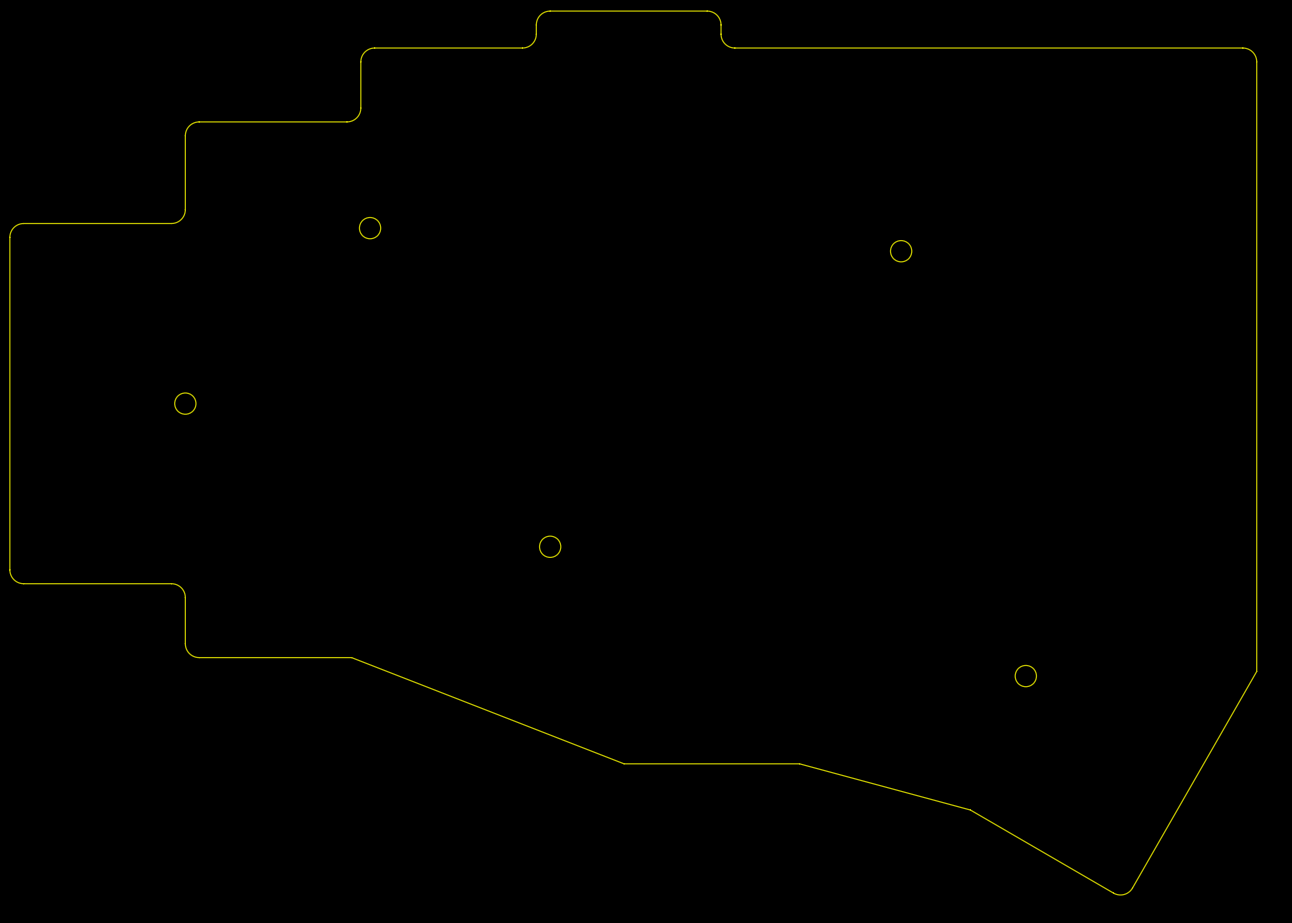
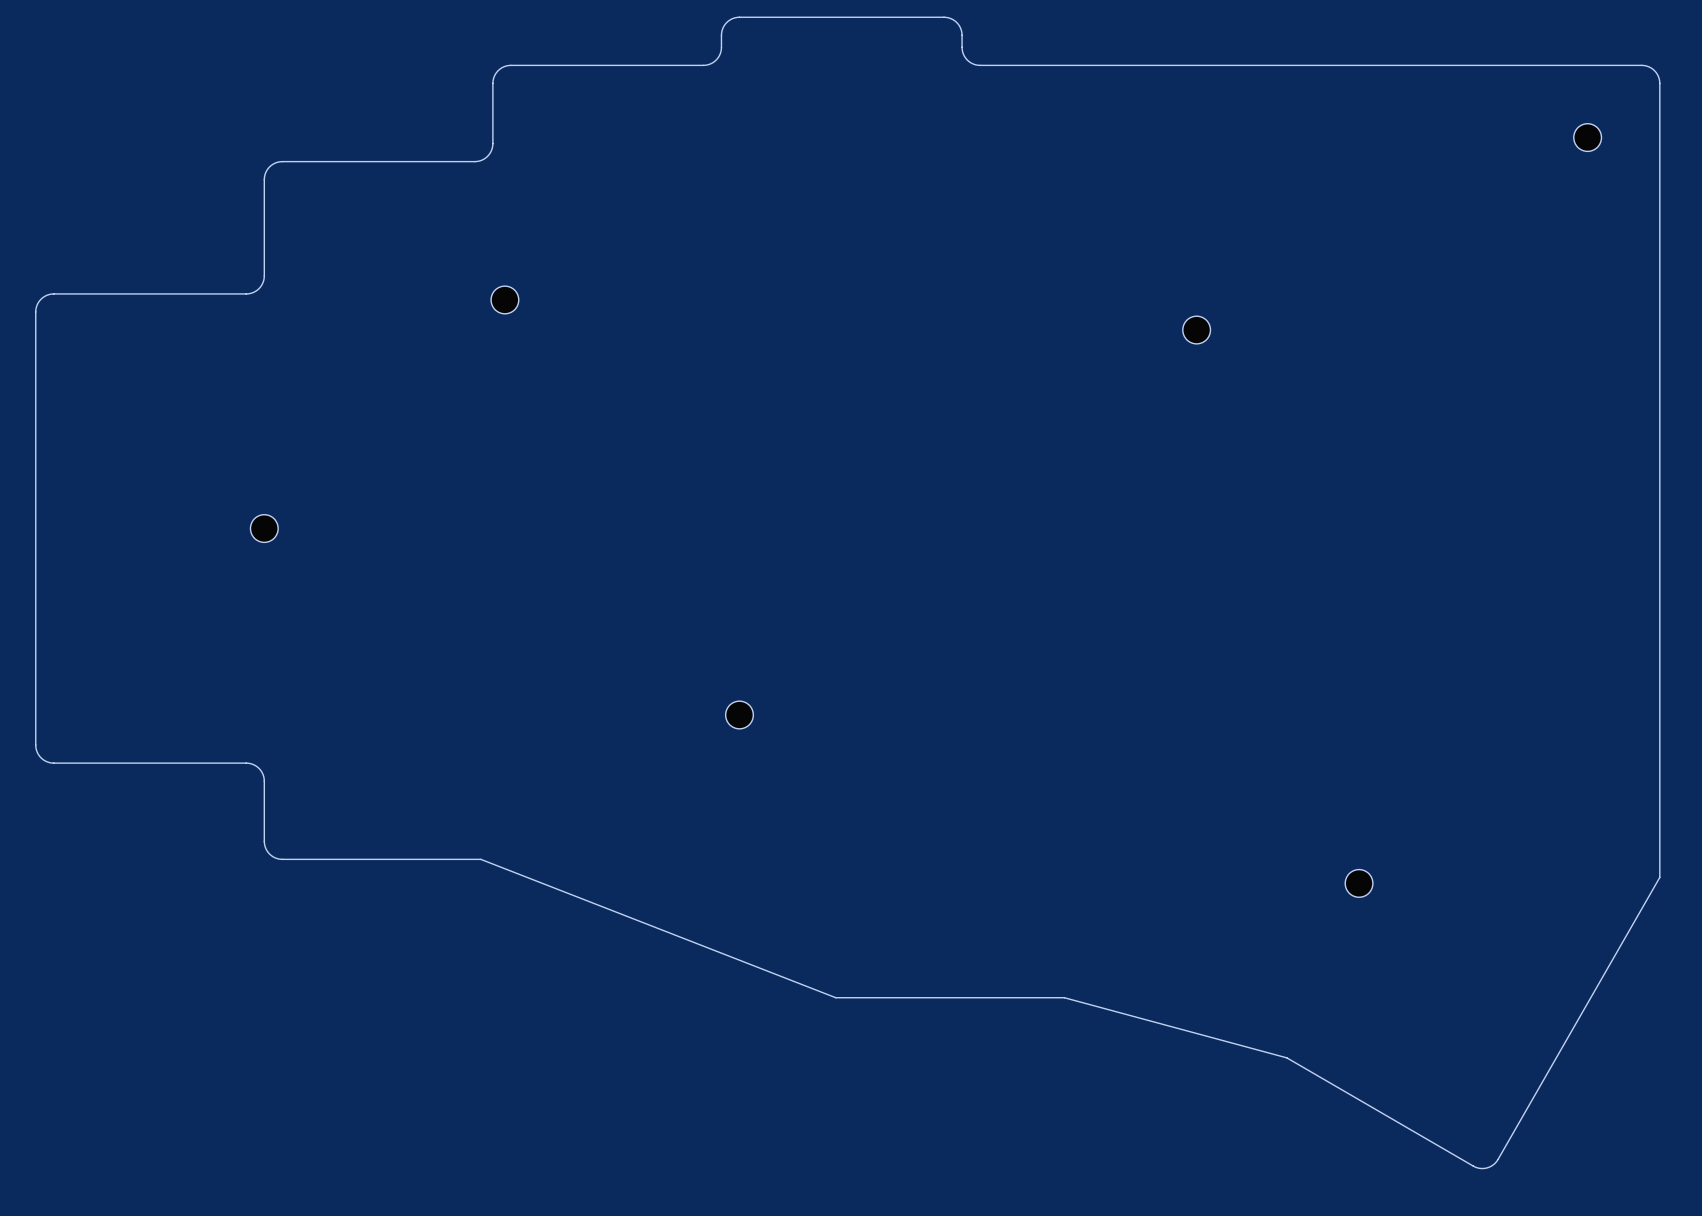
part: none -> (1587, 137)

